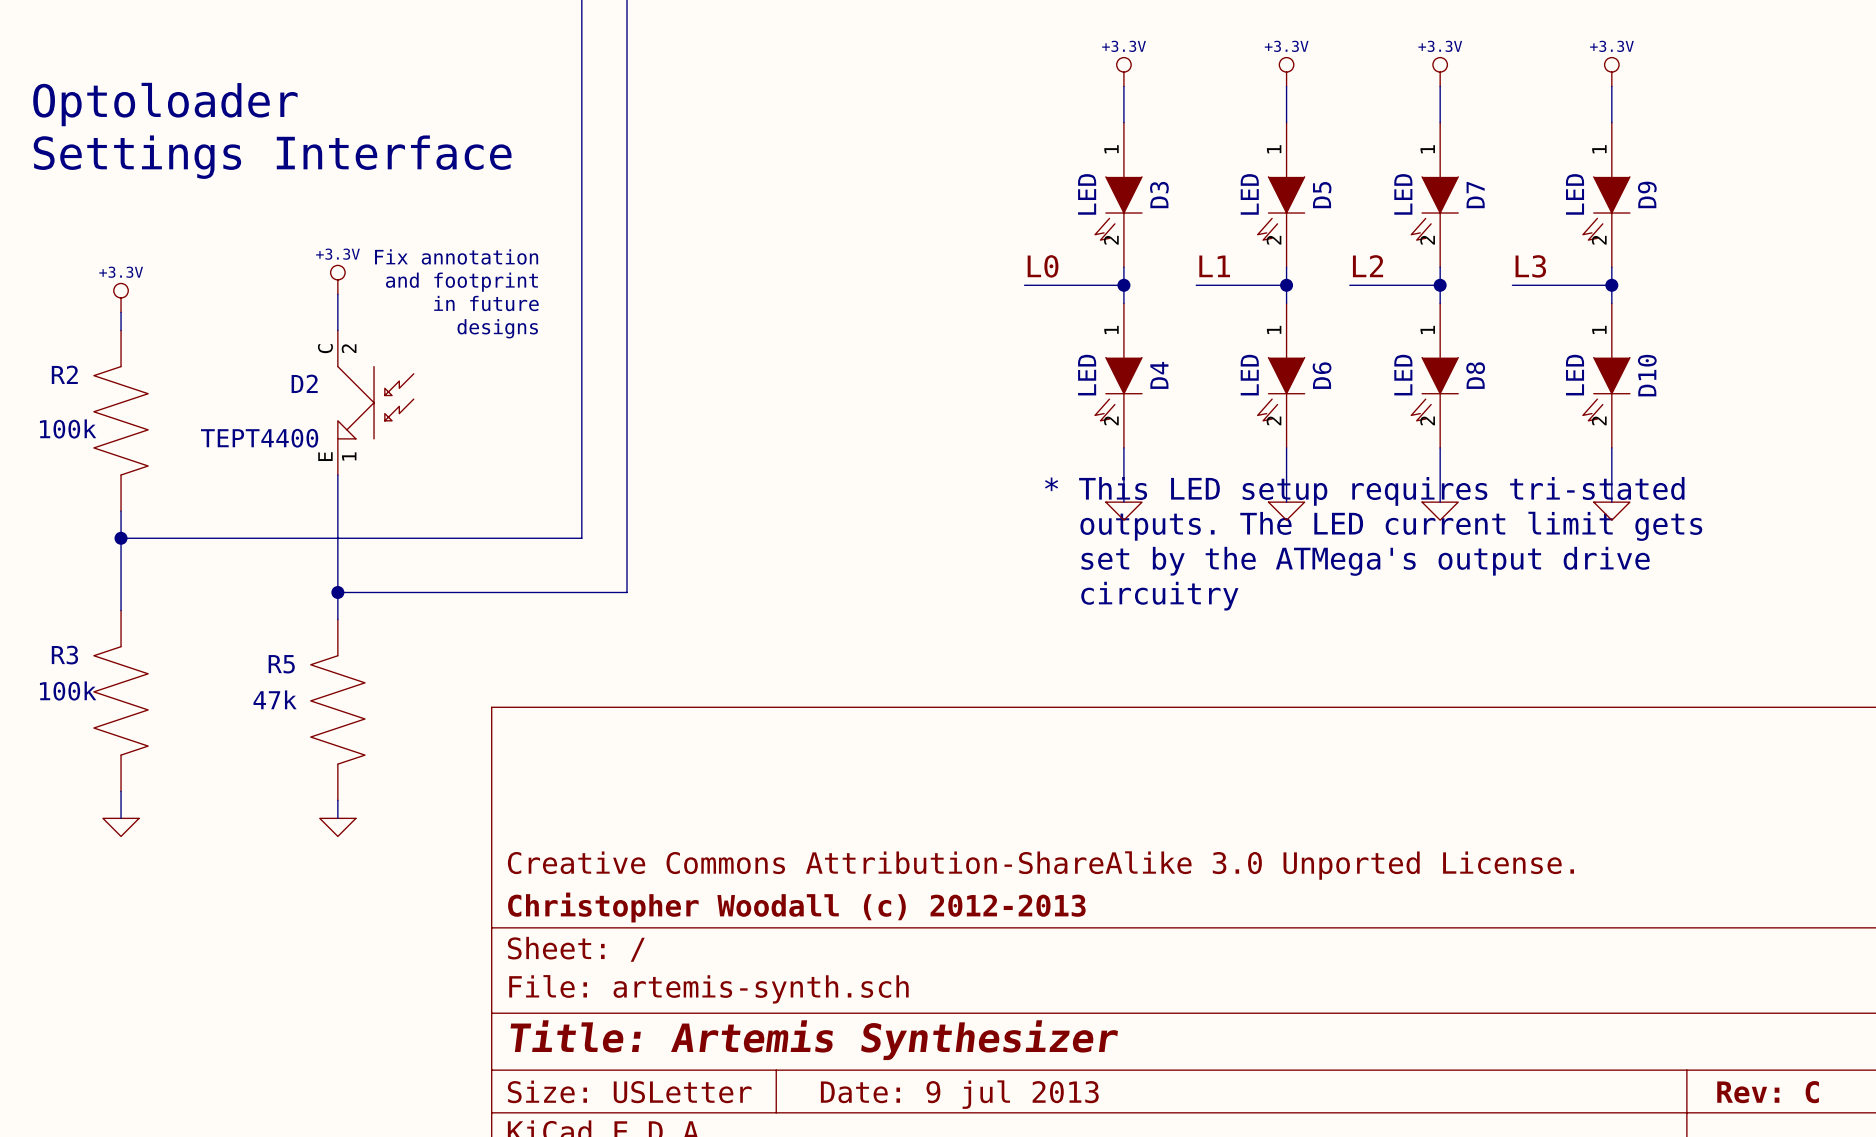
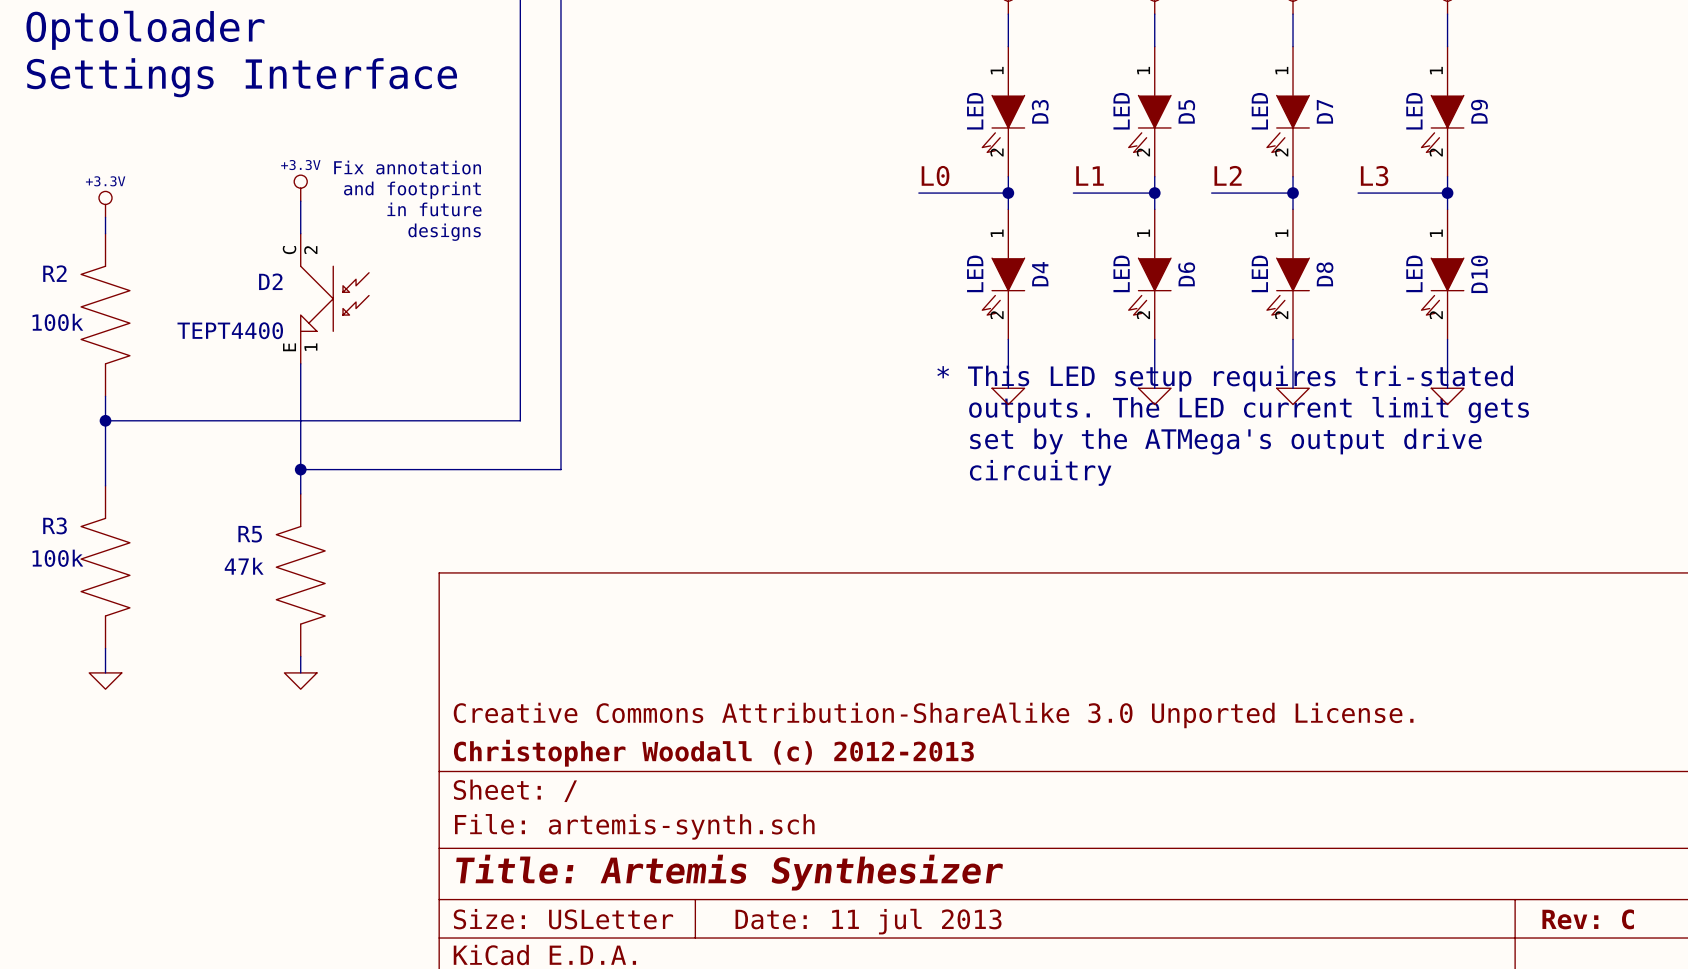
title block: Date: 9 jul 2013 (959, 1094) -> Date: 11 jul 2013 (868, 921)

